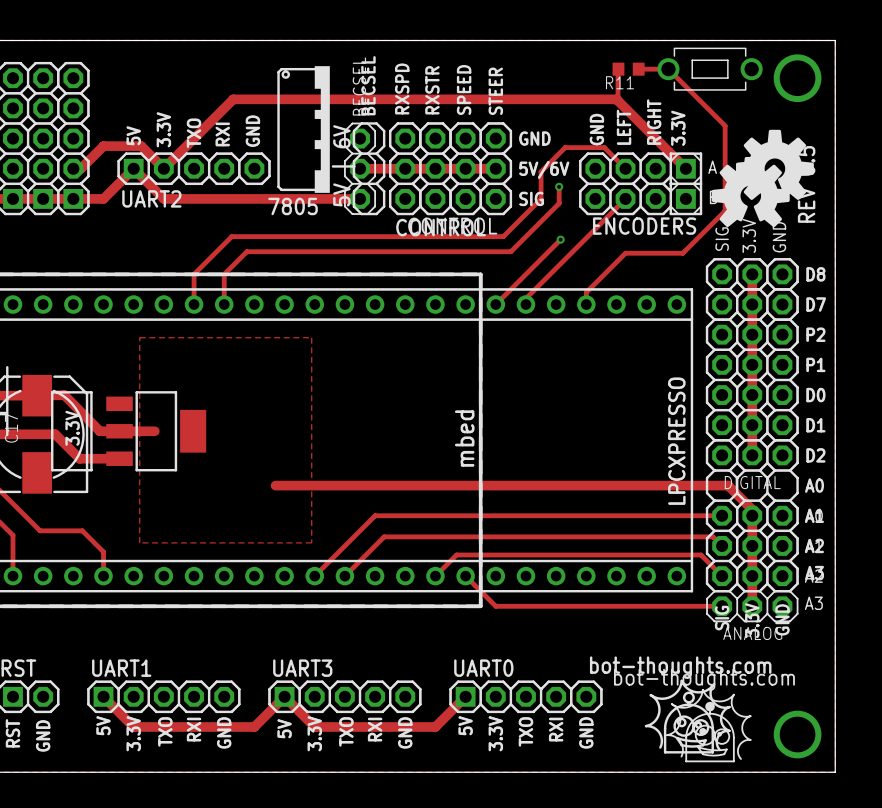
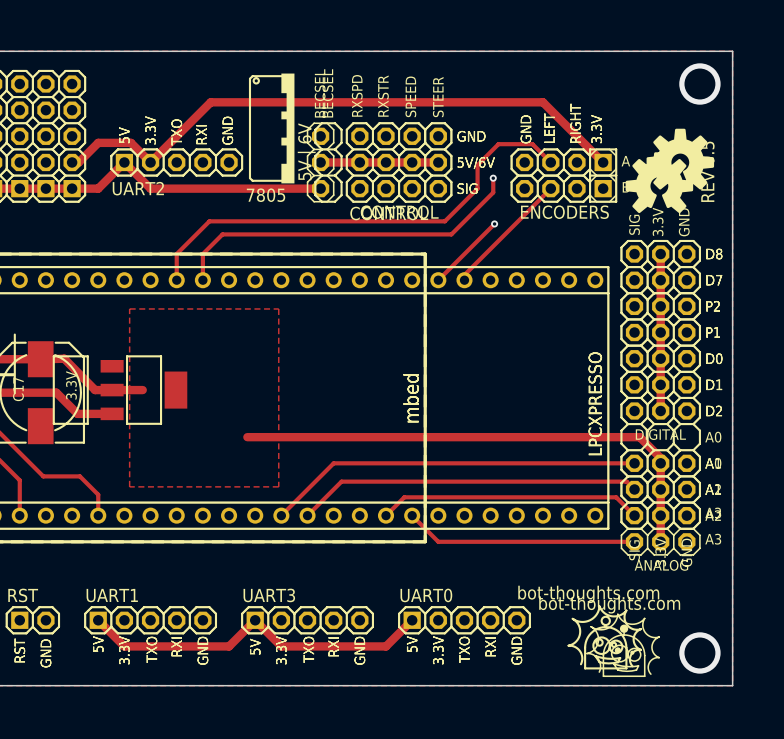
track: (618, 69) (618, 100) -> none
R11: (628, 69) -> none
track: (638, 69) (668, 69) (725, 125) (725, 210) (682, 253) (625, 253) (586, 292) (586, 304) -> none
part: (710, 69) -> none

